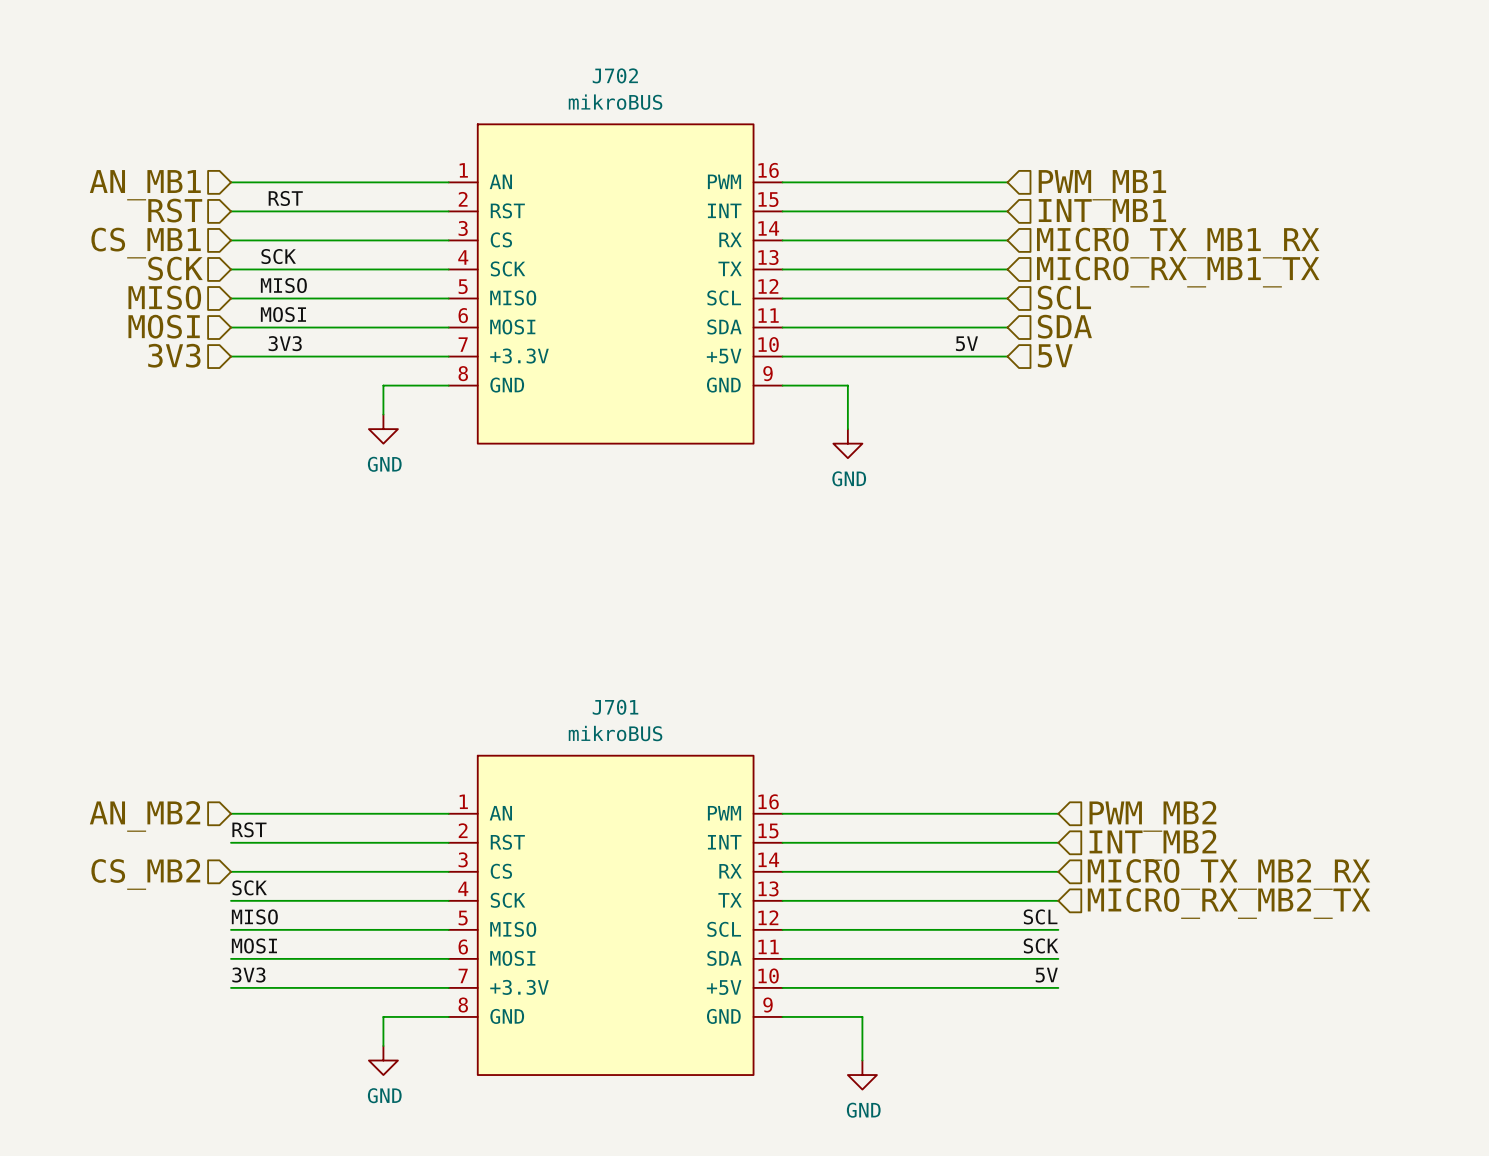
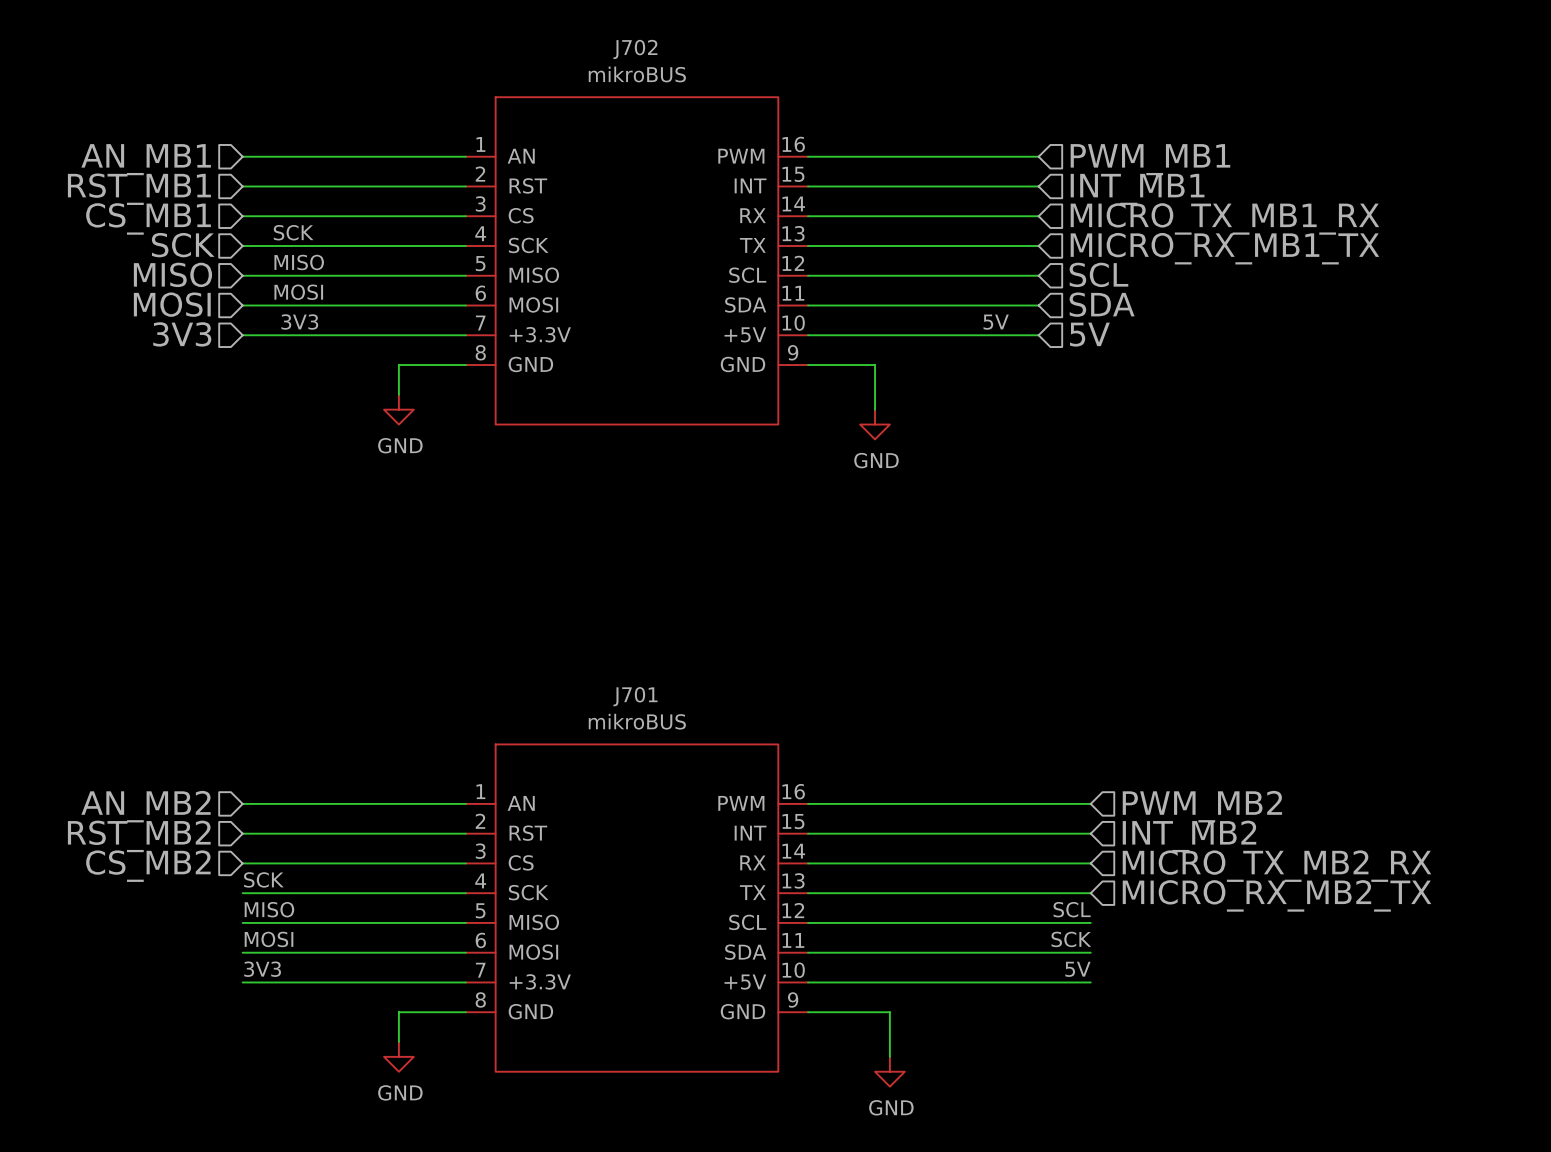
label: RST (285, 198) -> none
hierarchical label: RST (175, 210) -> RST_MB1 (139, 189)
label: RST (249, 829) -> none
hierarchical label: none -> RST_MB2 (139, 836)

